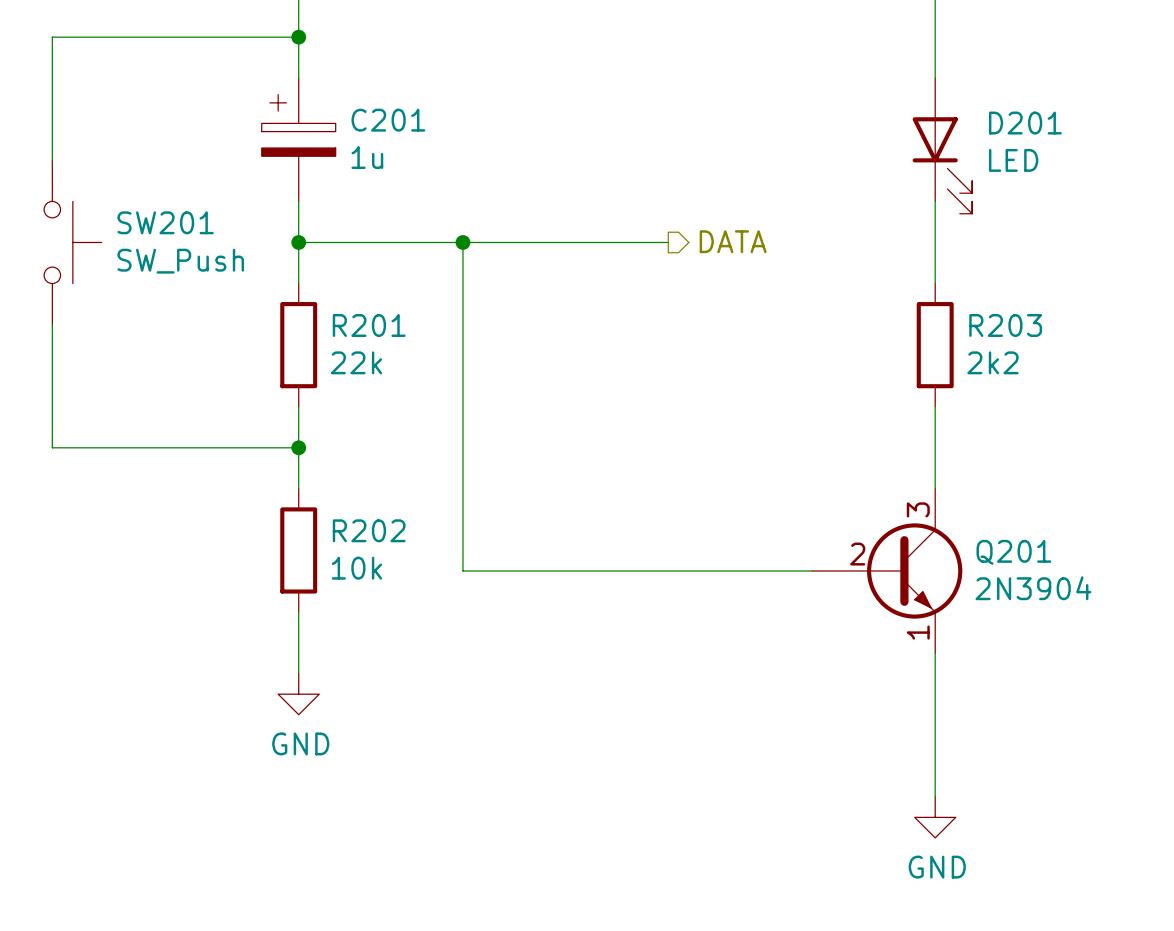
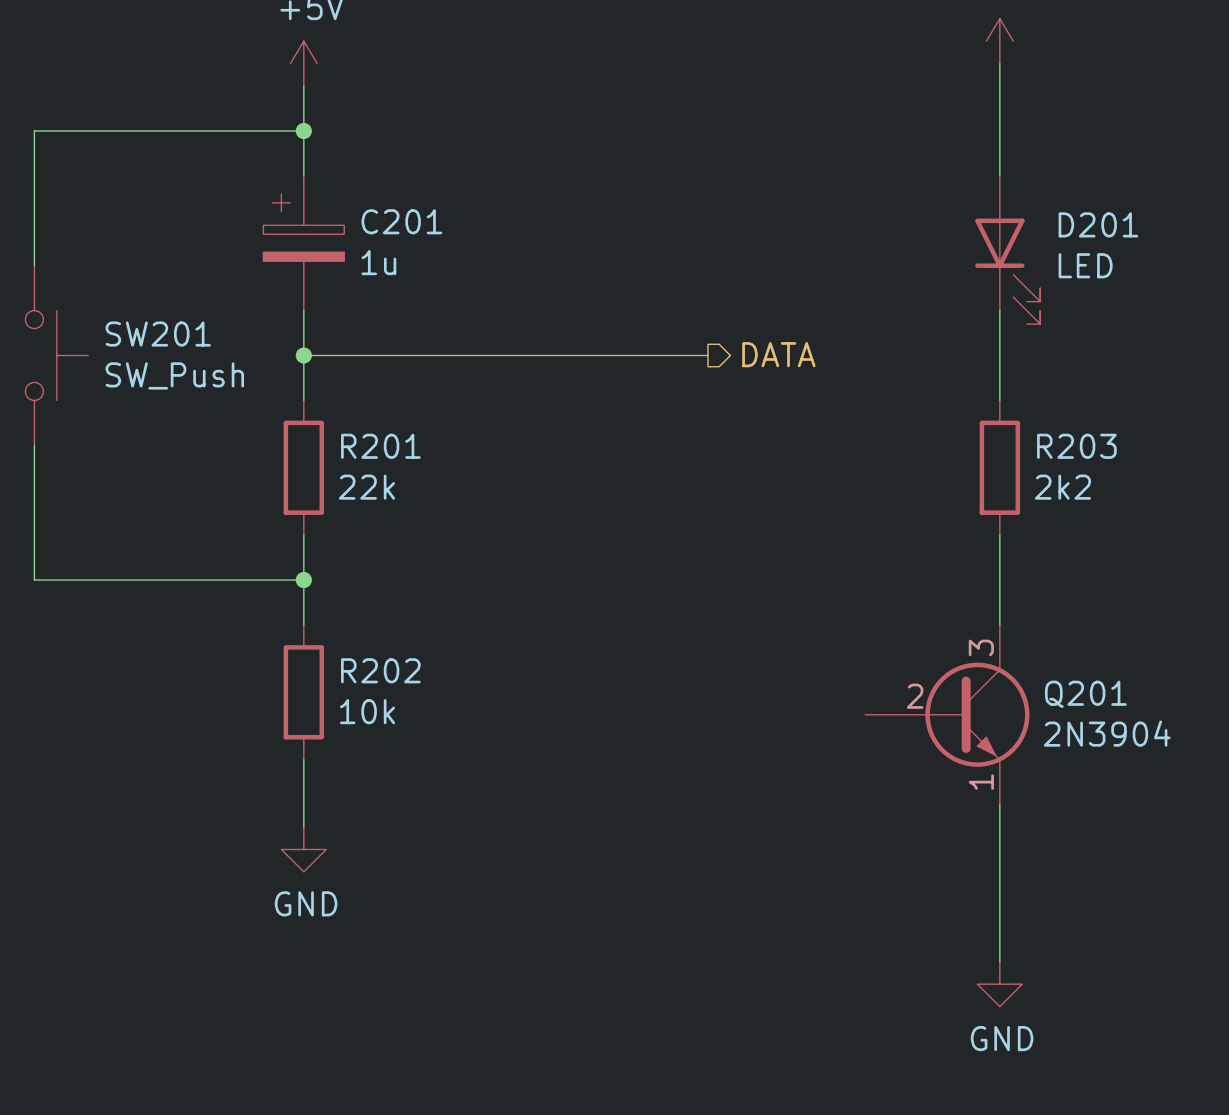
wire: (462, 242) (462, 570) (812, 570) -> none
junction: (462, 242) -> none

